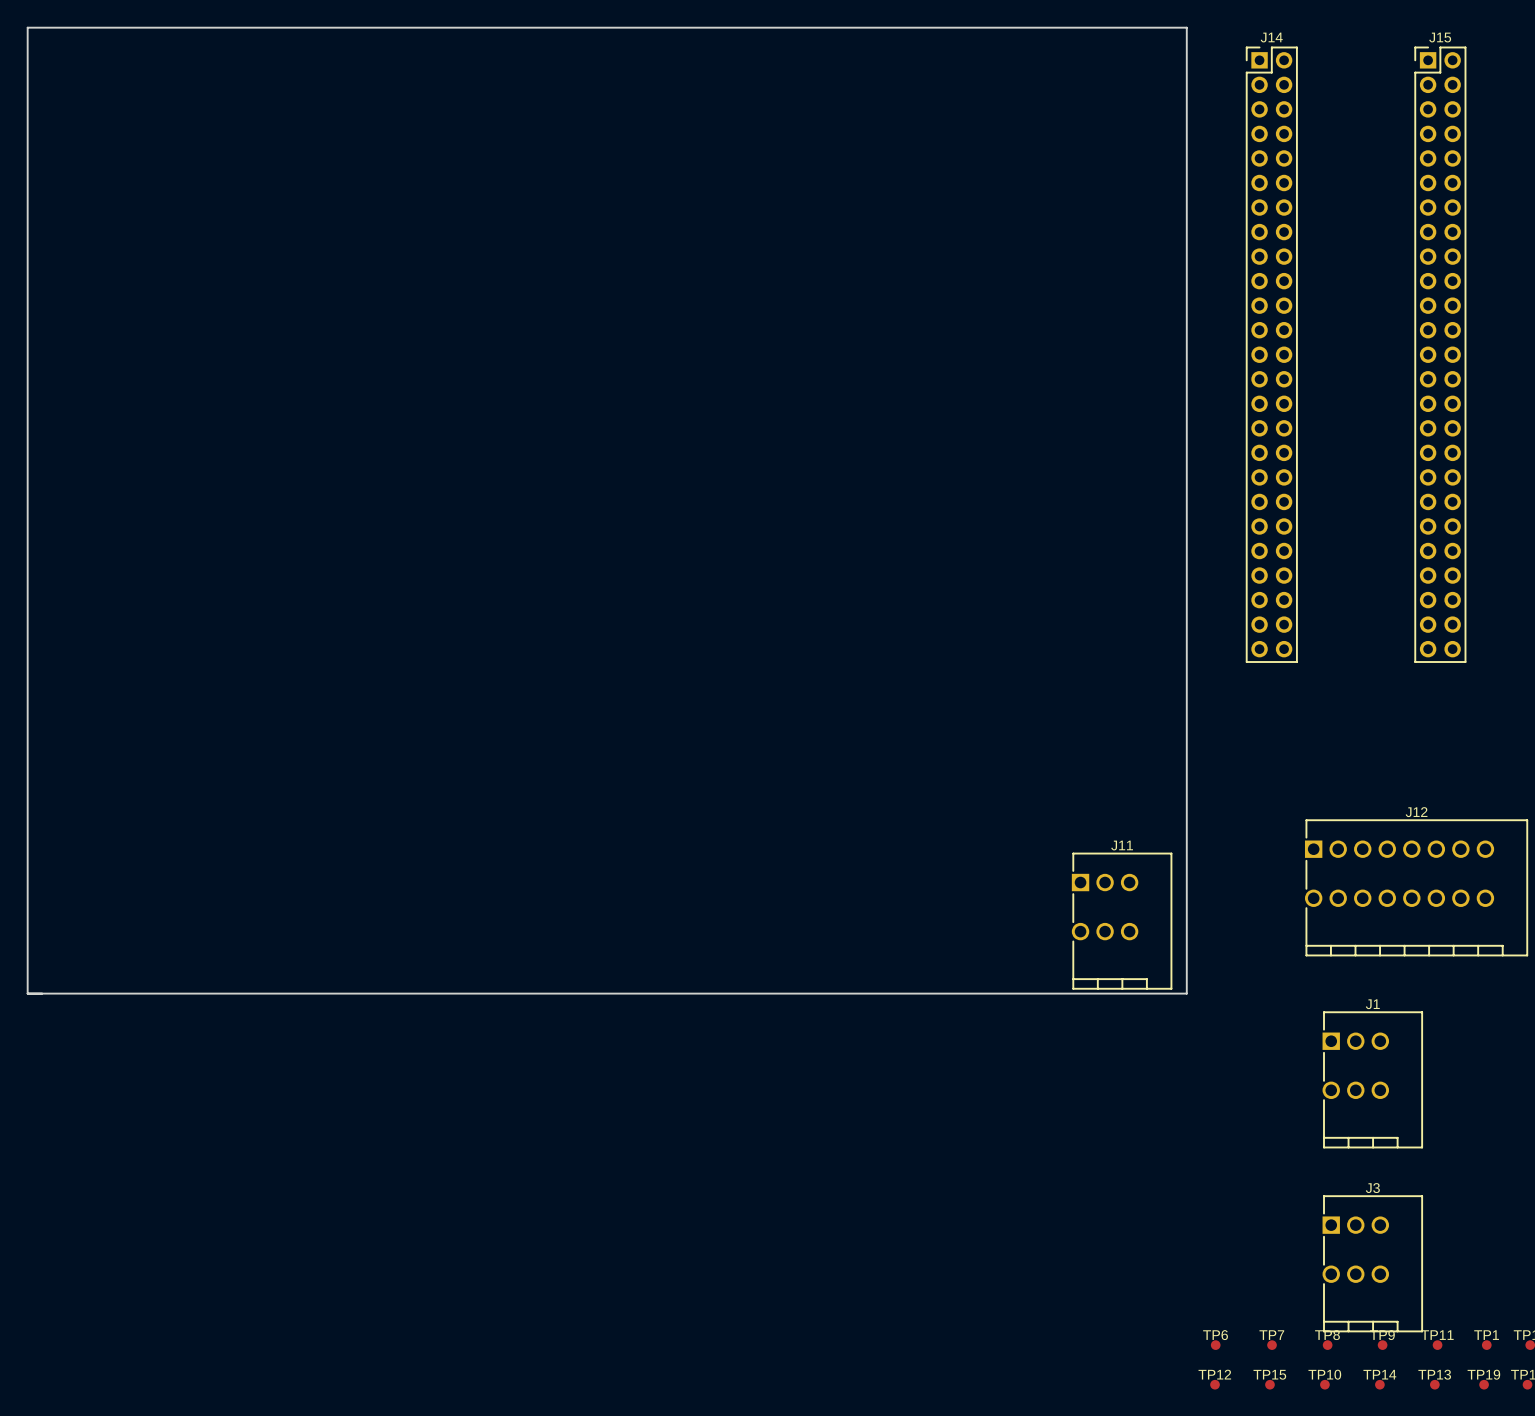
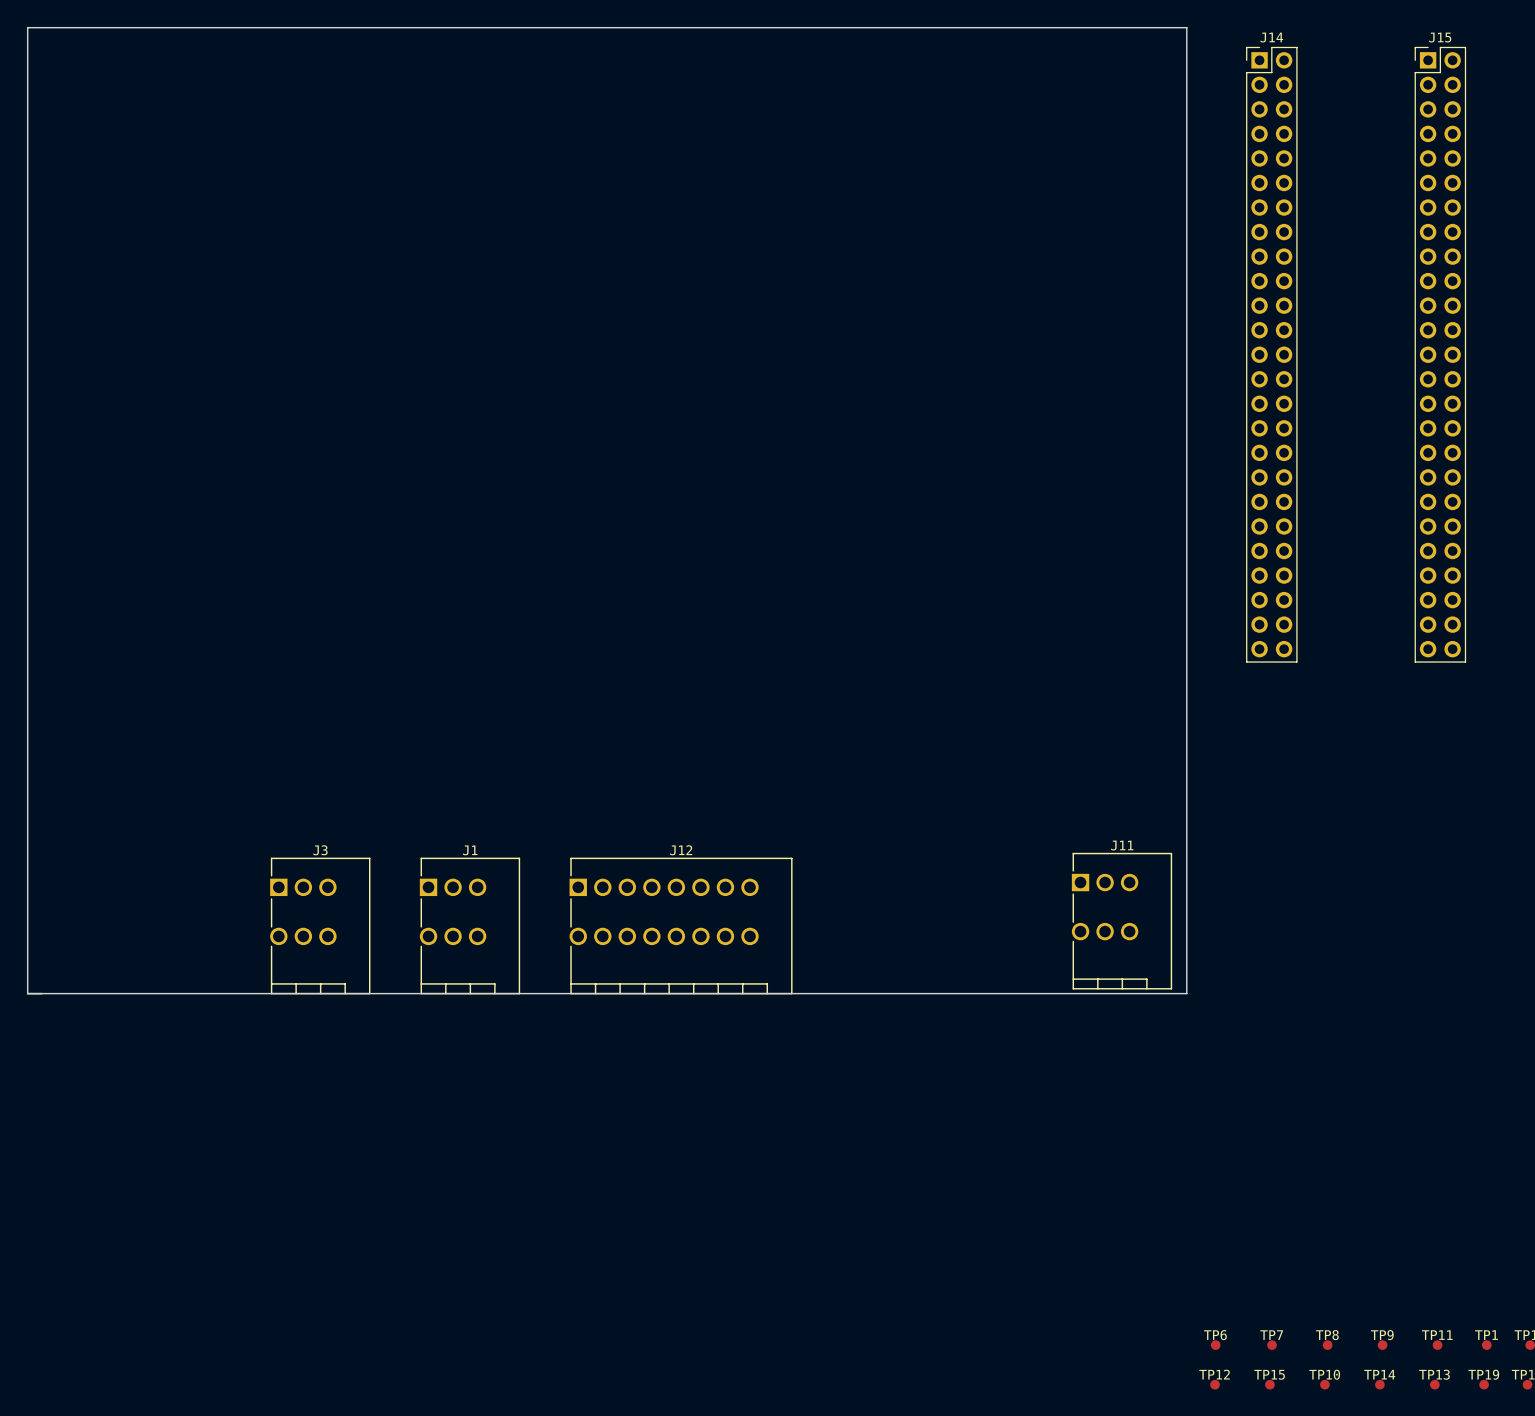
J12 position: (1416, 887) -> (681, 925)
J1 position: (1372, 1079) -> (470, 925)
J3 position: (1372, 1263) -> (320, 925)

